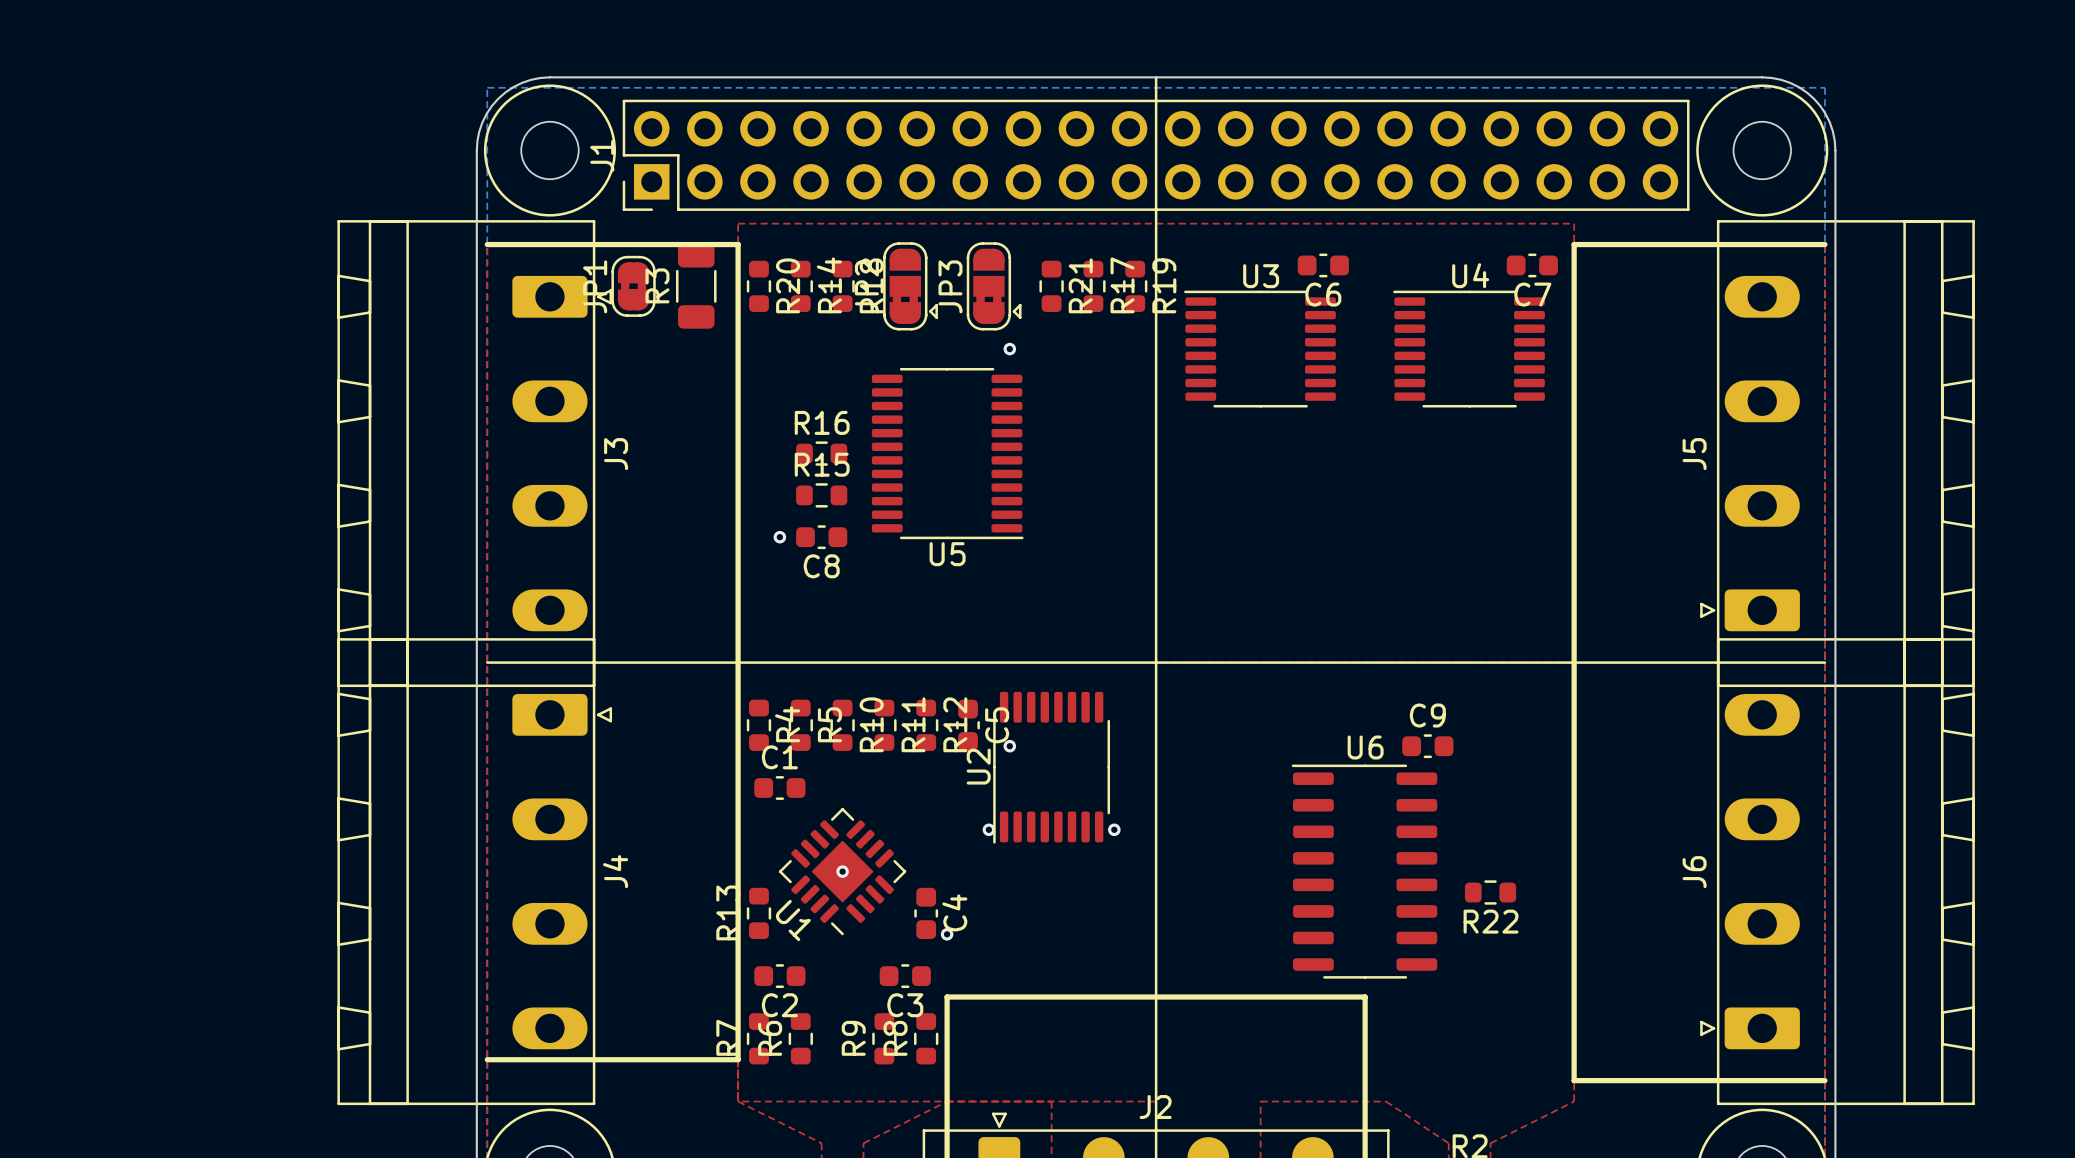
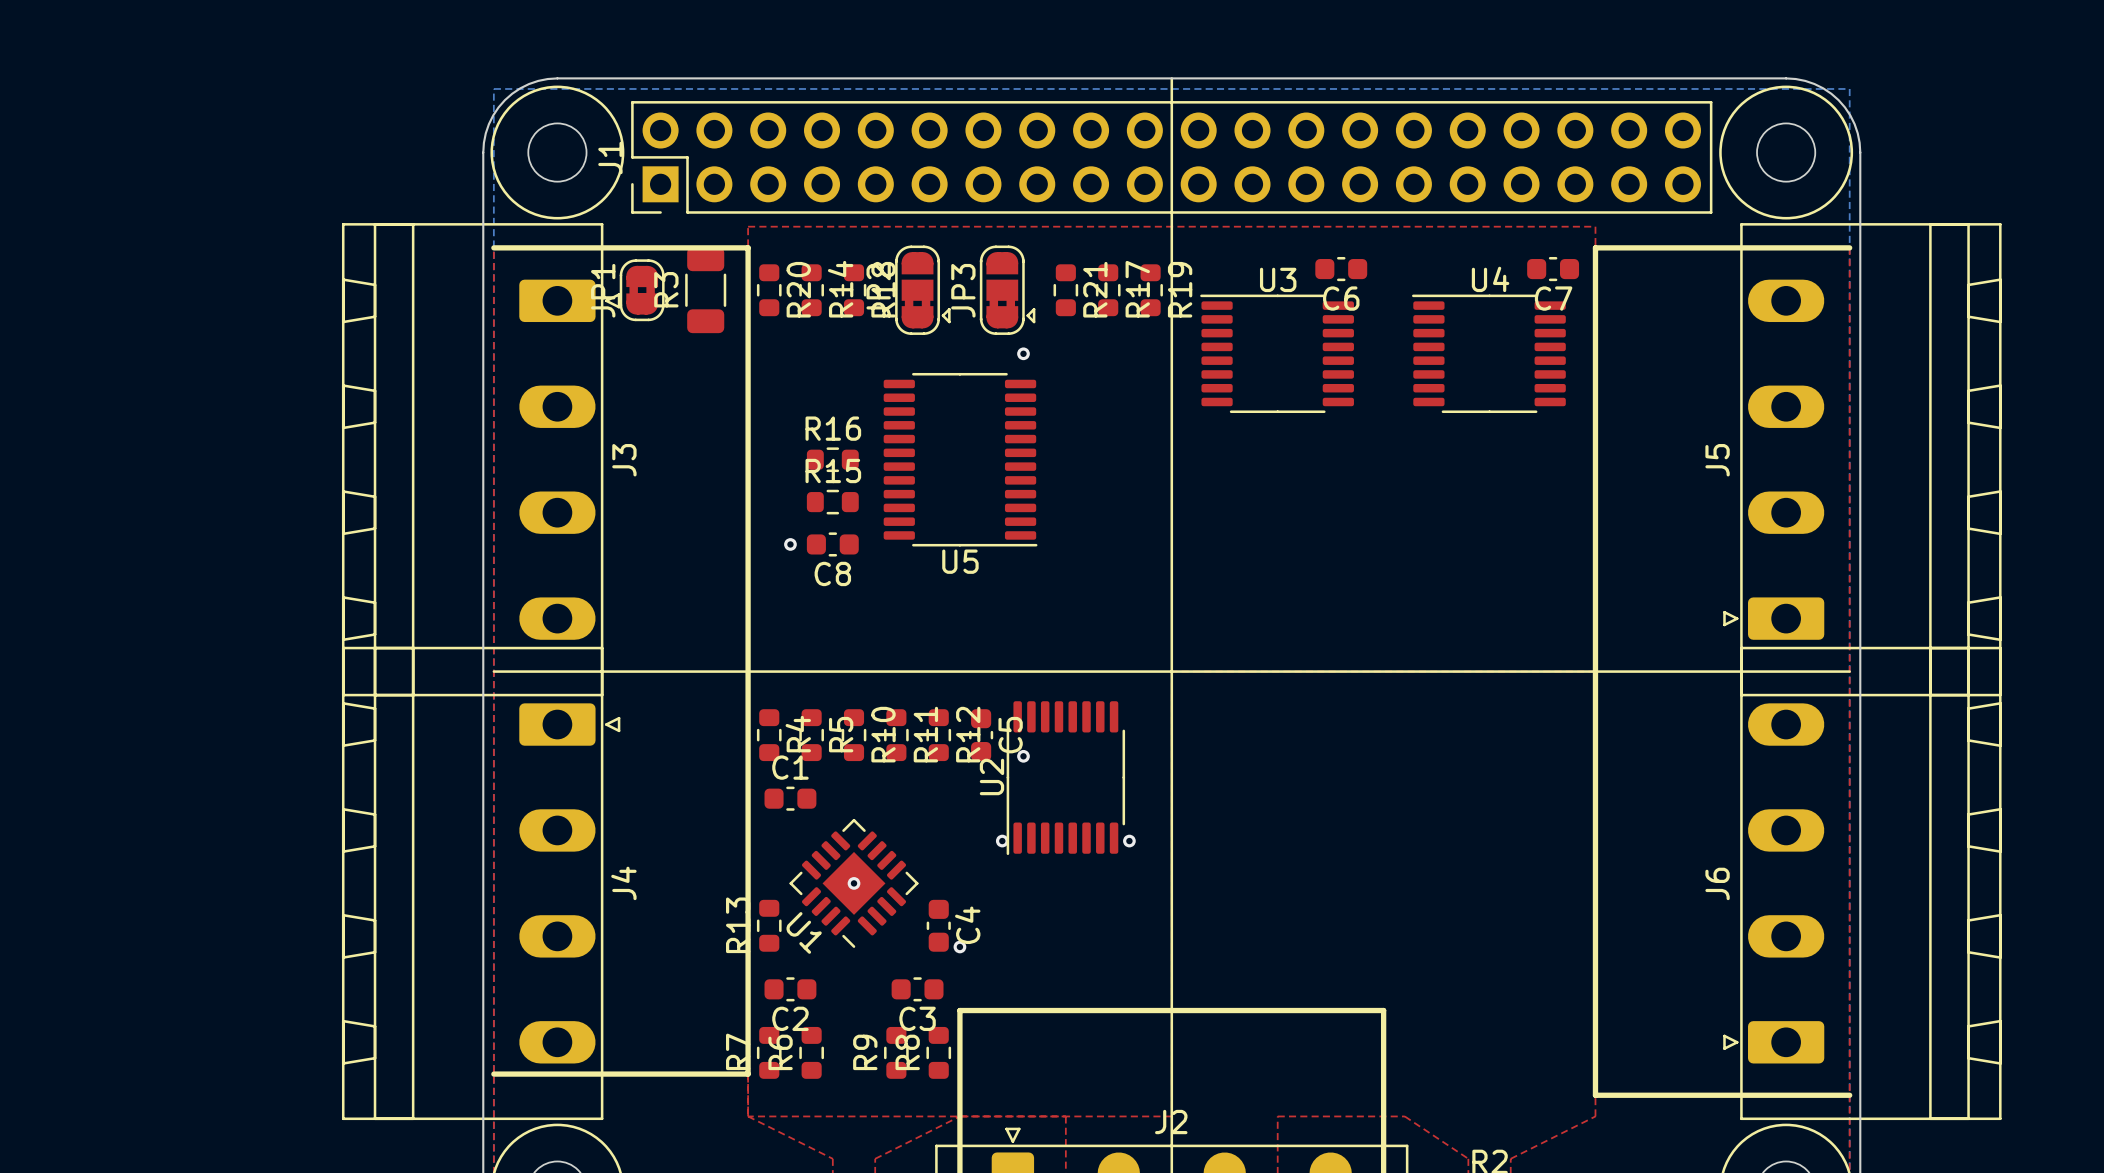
C9: (1427, 746) -> none
U6: (1364, 871) -> none
R22: (1490, 892) -> none

